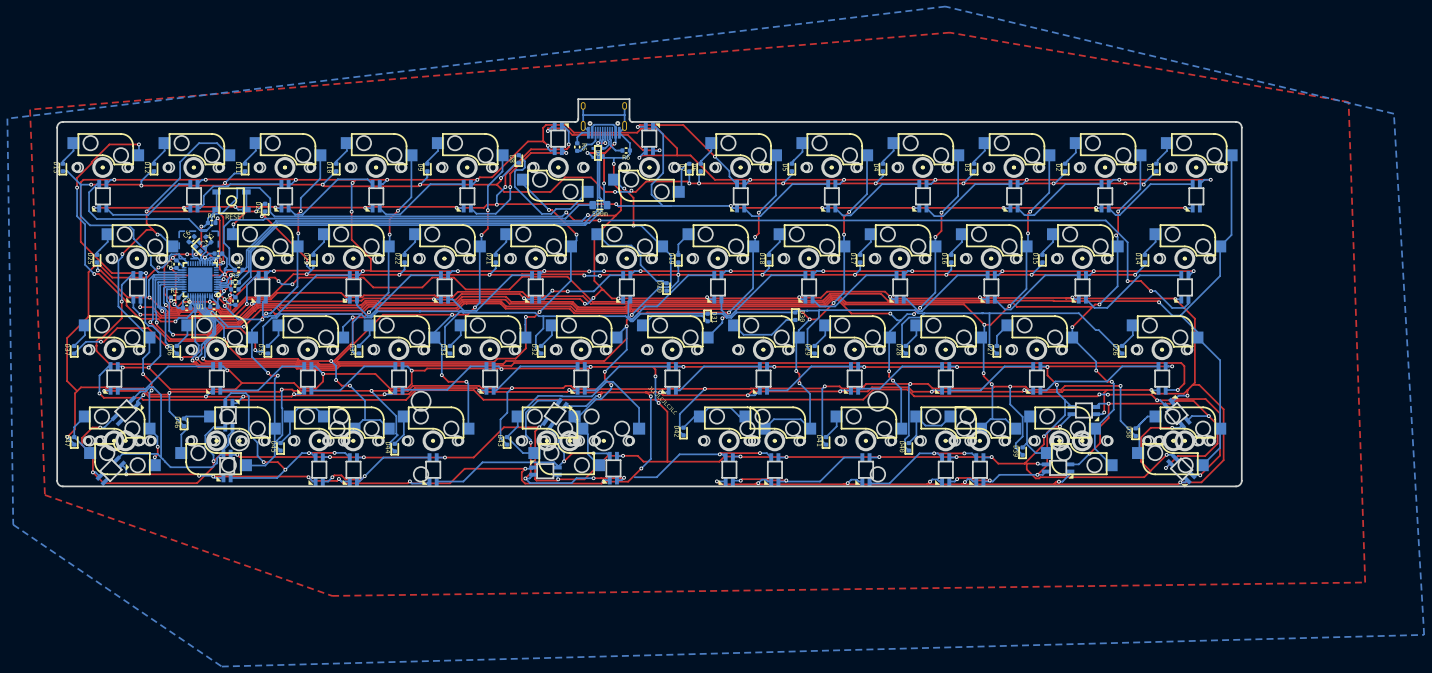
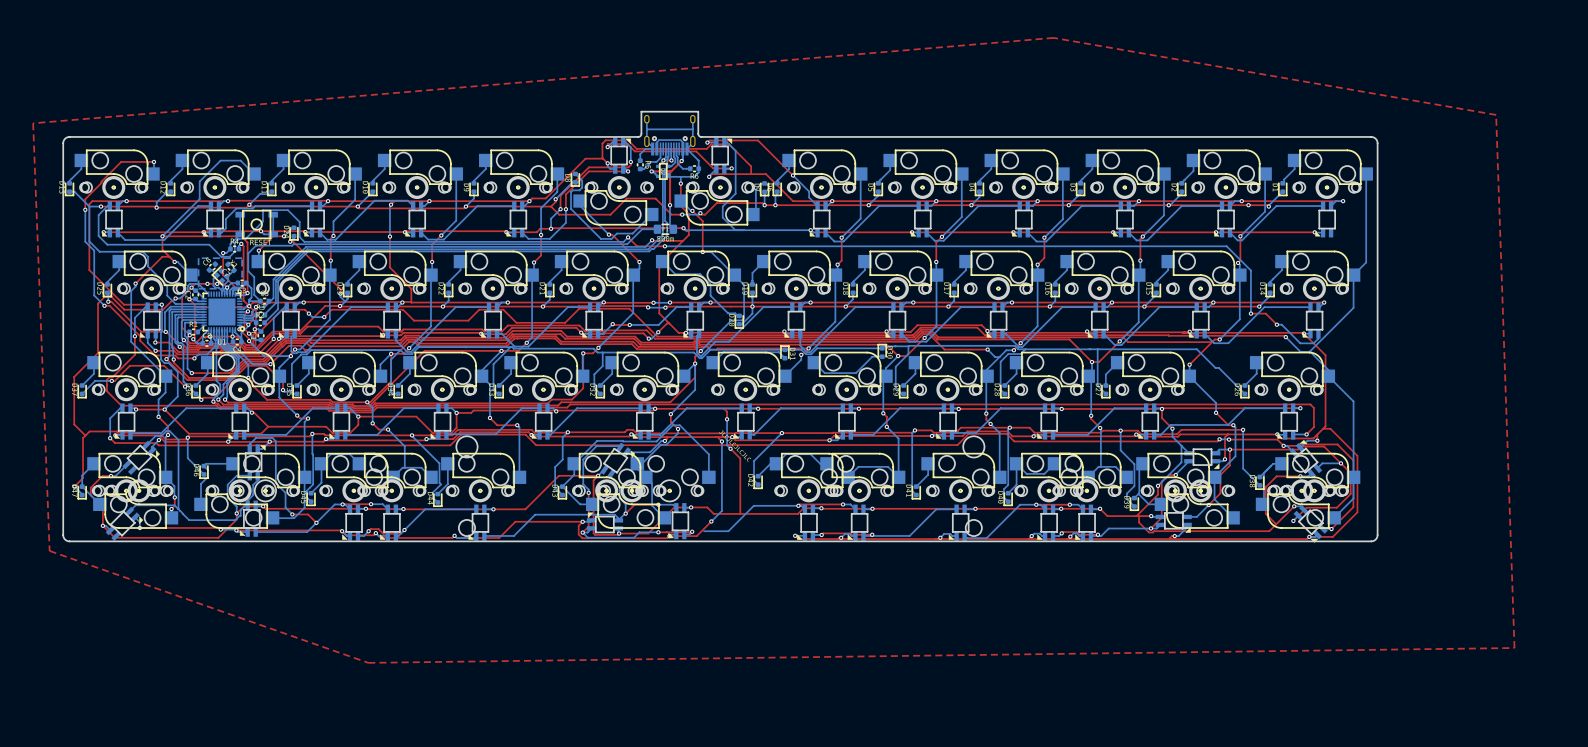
bottom zone outline: (945, 6) (1393, 113) (1424, 634) (221, 666) (13, 524) (7, 118) (945, 6) -> none

